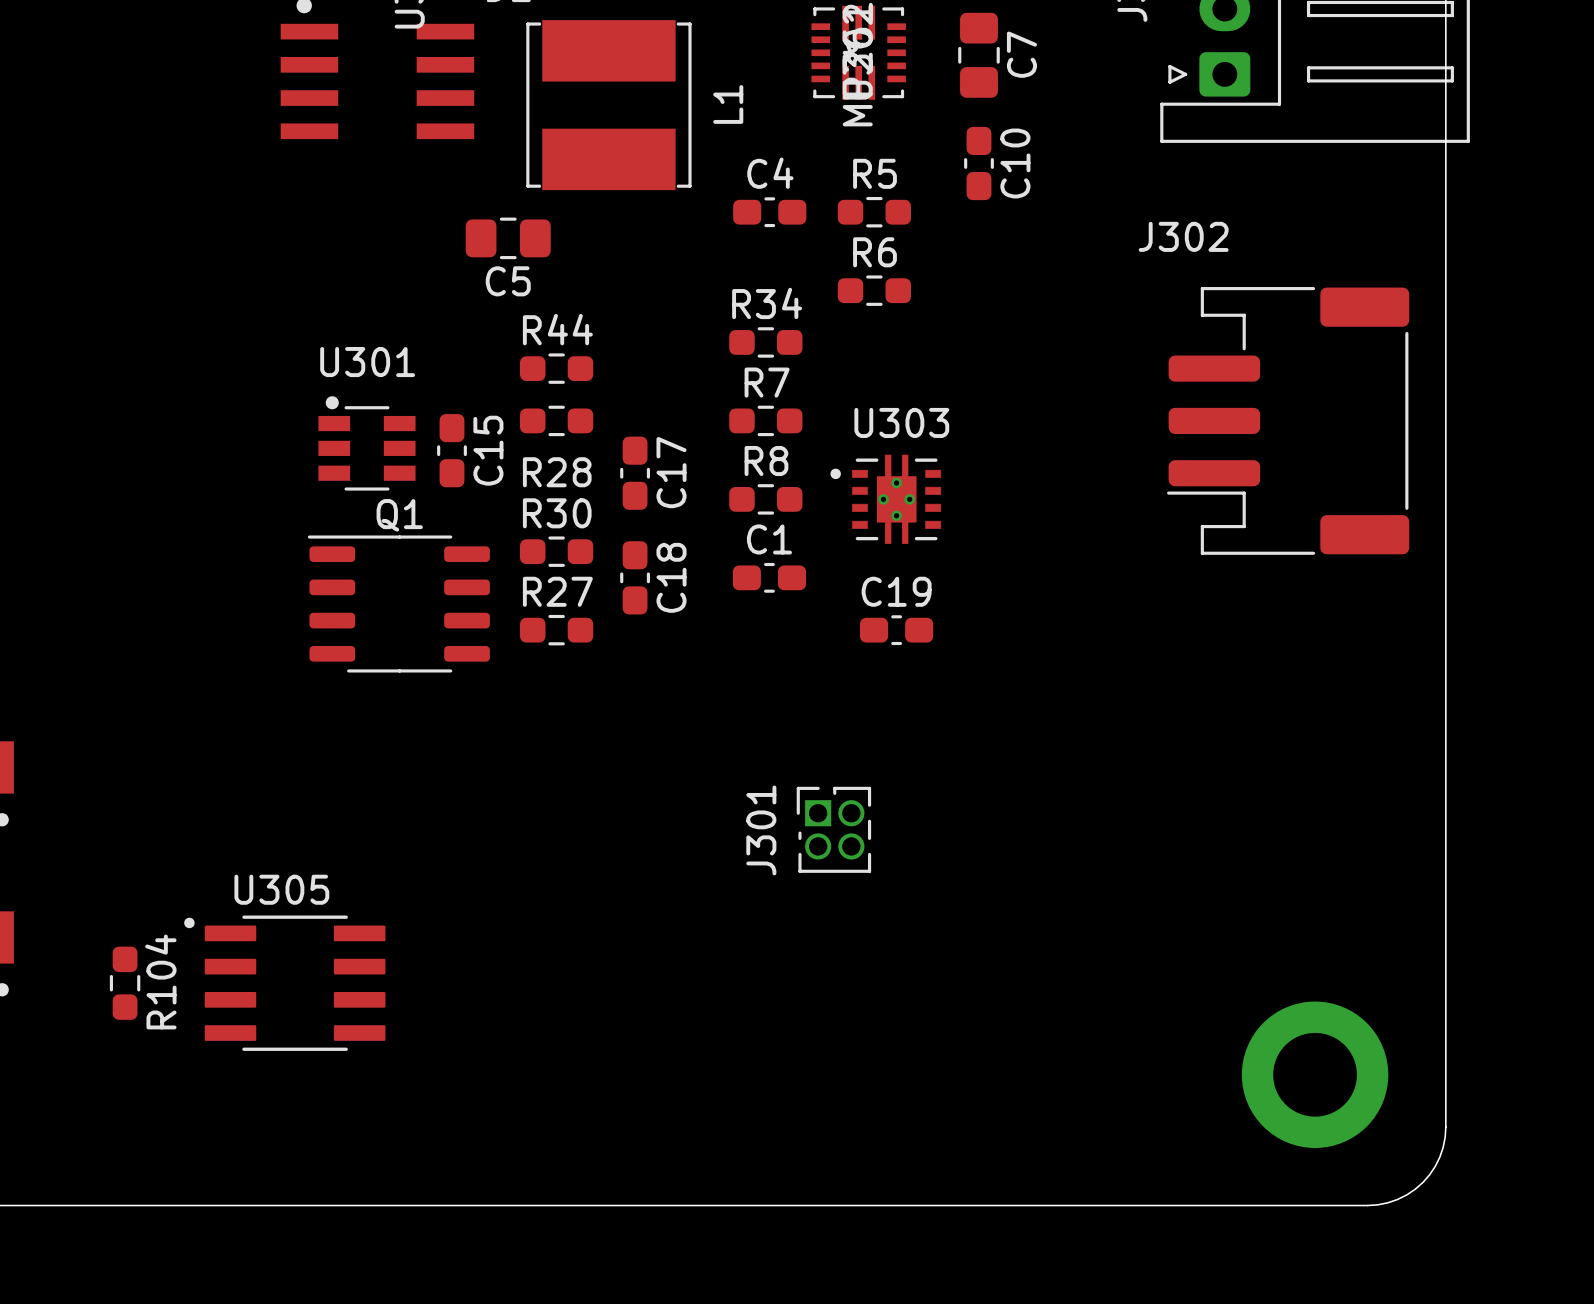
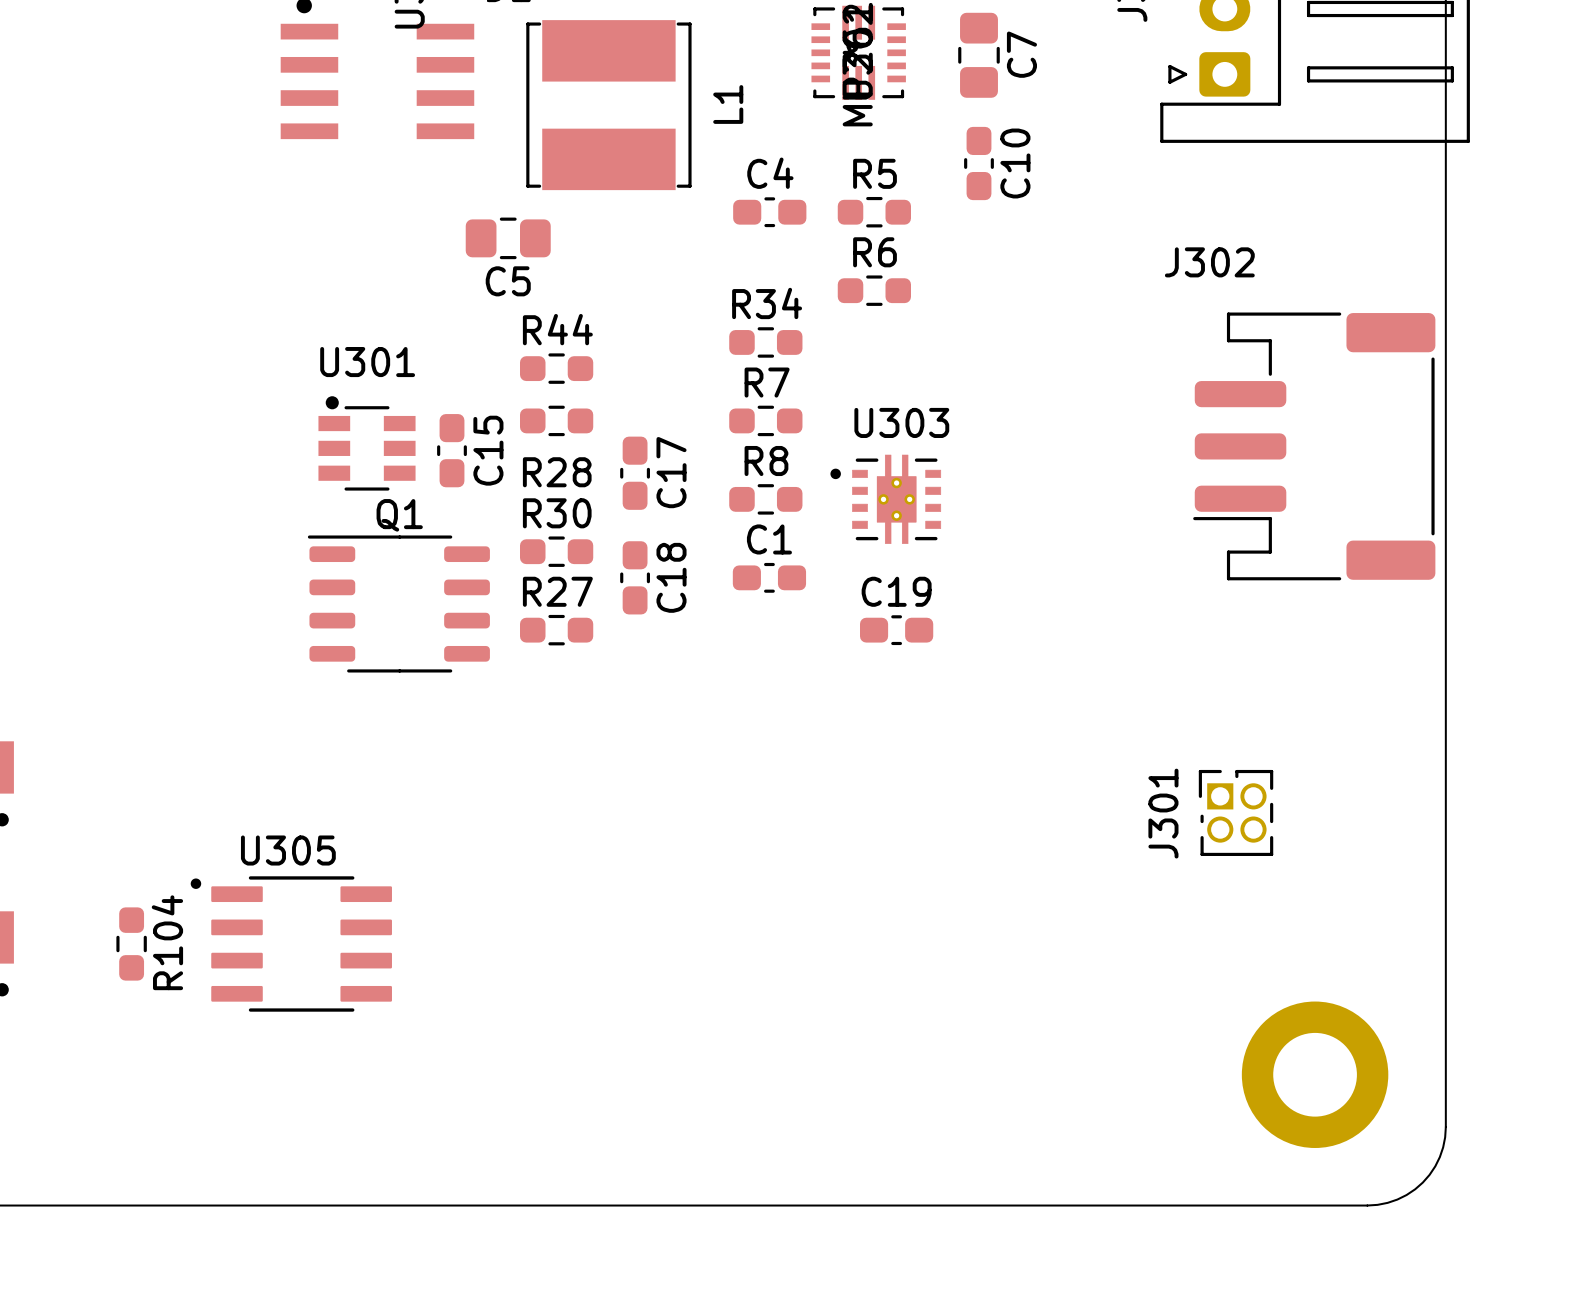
J302 position: (1288, 420) -> (1314, 446)
J301 position: (833, 829) -> (1236, 812)
R104 position: (125, 983) -> (131, 943)
U305 position: (284, 983) -> (291, 943)

